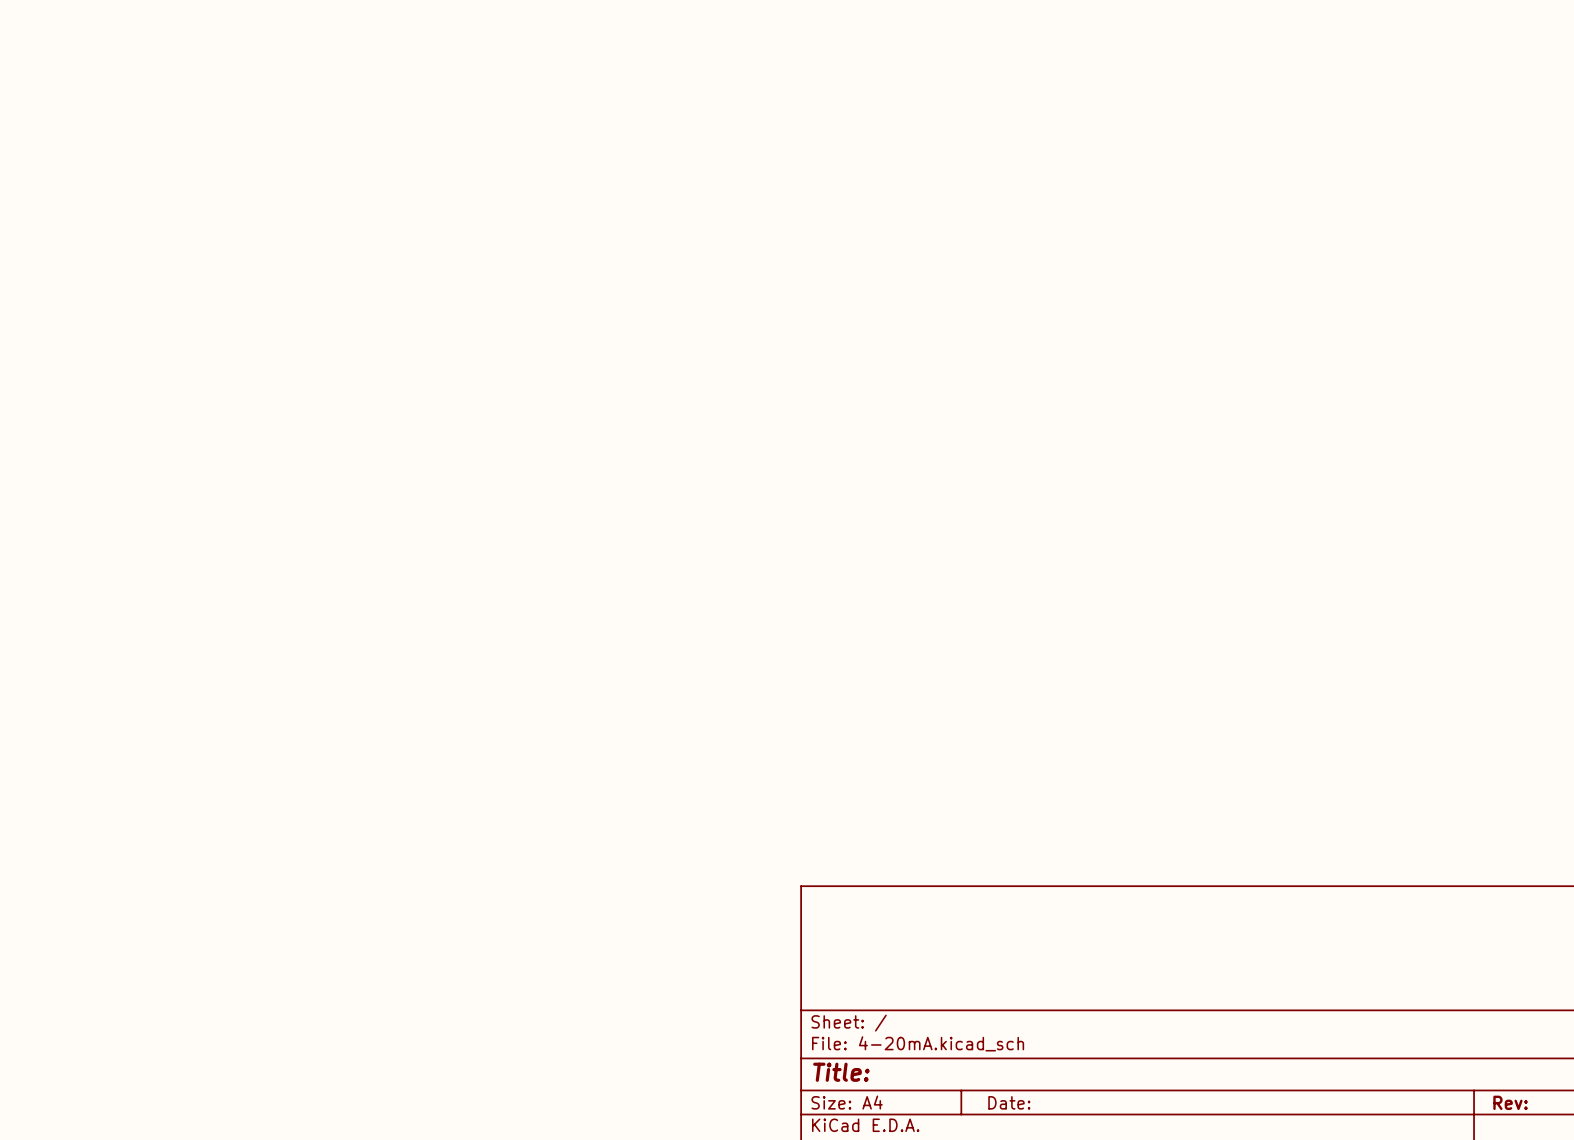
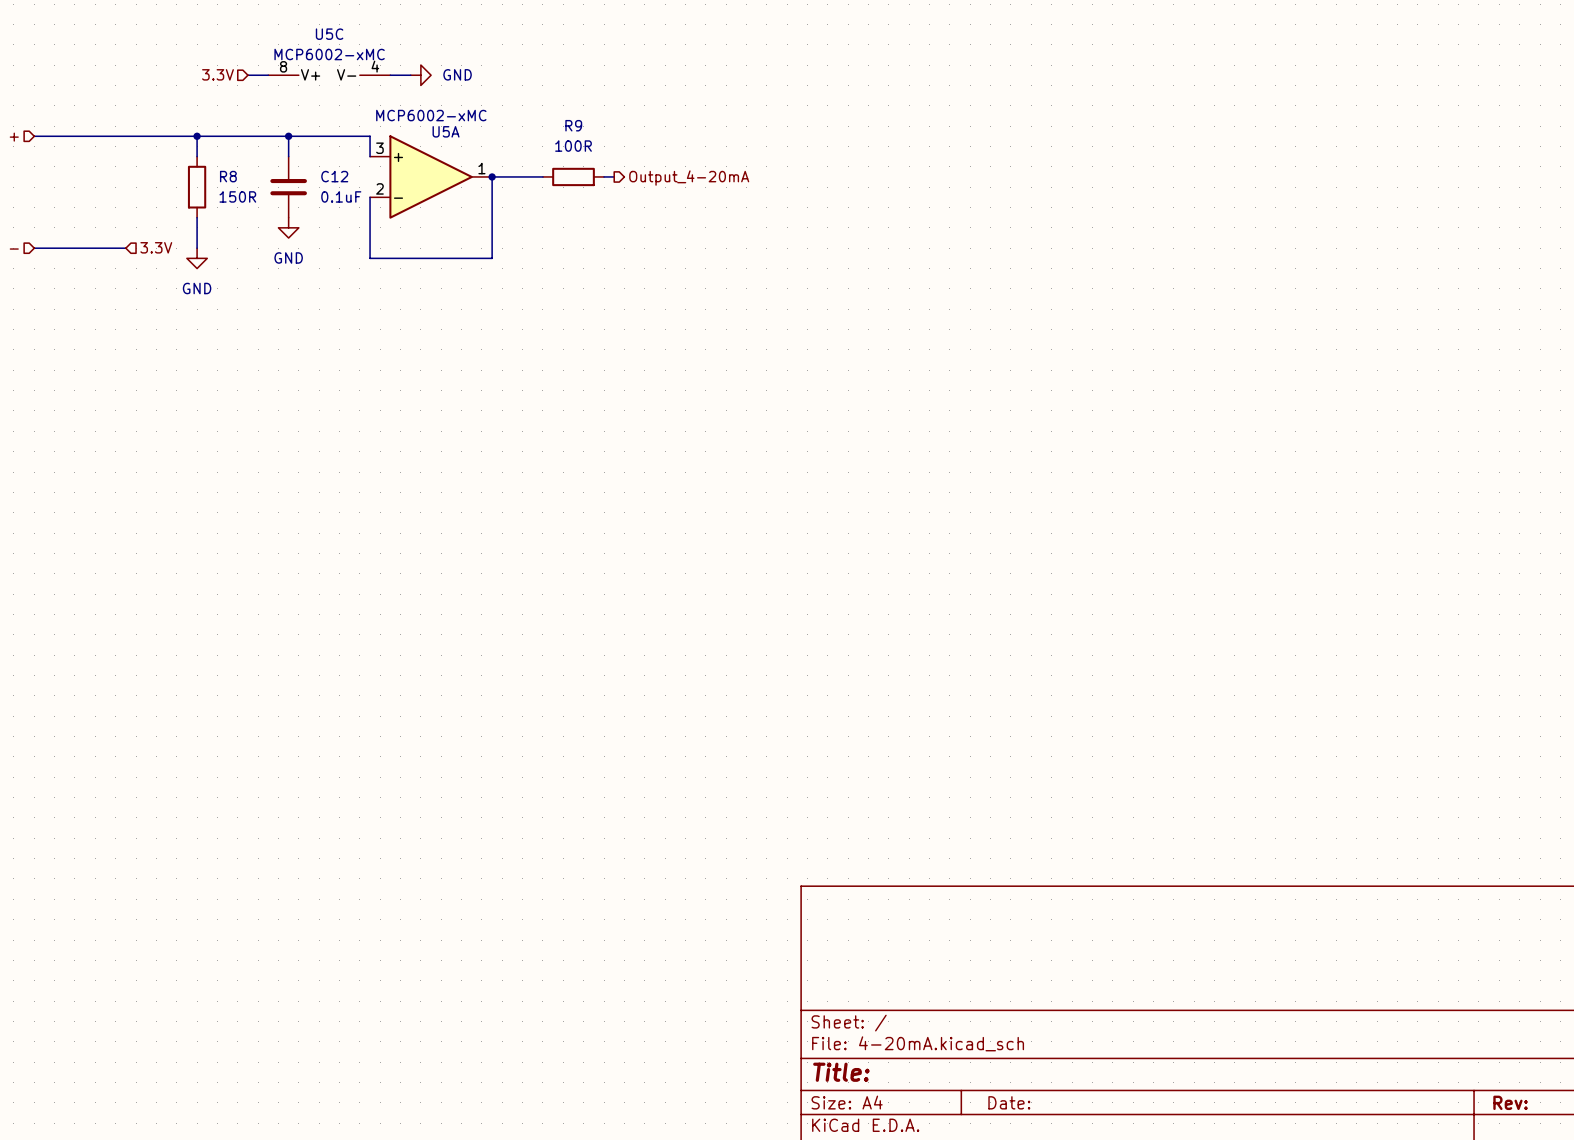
hierarchical label: none -> 3.3V (217, 74)
wire: none -> (247, 75) (268, 75)
U5C: none -> MCP6002-xMC (329, 75)
wire: none -> (390, 75) (410, 75)
power symbol: none -> GND (420, 75)
wire: none -> (34, 136) (370, 136) (370, 156)
wire: none -> (197, 136) (197, 156)
junction: none -> (197, 136)
wire: none -> (288, 136) (288, 156)
junction: none -> (288, 136)
hierarchical label: none -> + (14, 137)
U5A: none -> MCP6002-xMC (431, 176)
junction: none -> (492, 176)
wire: none -> (542, 176) (492, 176) (492, 258) (370, 258) (370, 197)
R9: none -> 100R (573, 176)
wire: none -> (604, 176) (614, 176)
hierarchical label: none -> Output_4-20mA (689, 178)
R8: none -> 150R (197, 187)
C12: none -> 0.1uF (288, 187)
wire: none -> (197, 217) (197, 248)
power symbol: none -> GND (288, 227)
hierarchical label: none -> 3.3V (156, 247)
wire: none -> (34, 248) (125, 248)
hierarchical label: none -> - (14, 249)
power symbol: none -> GND (197, 258)

